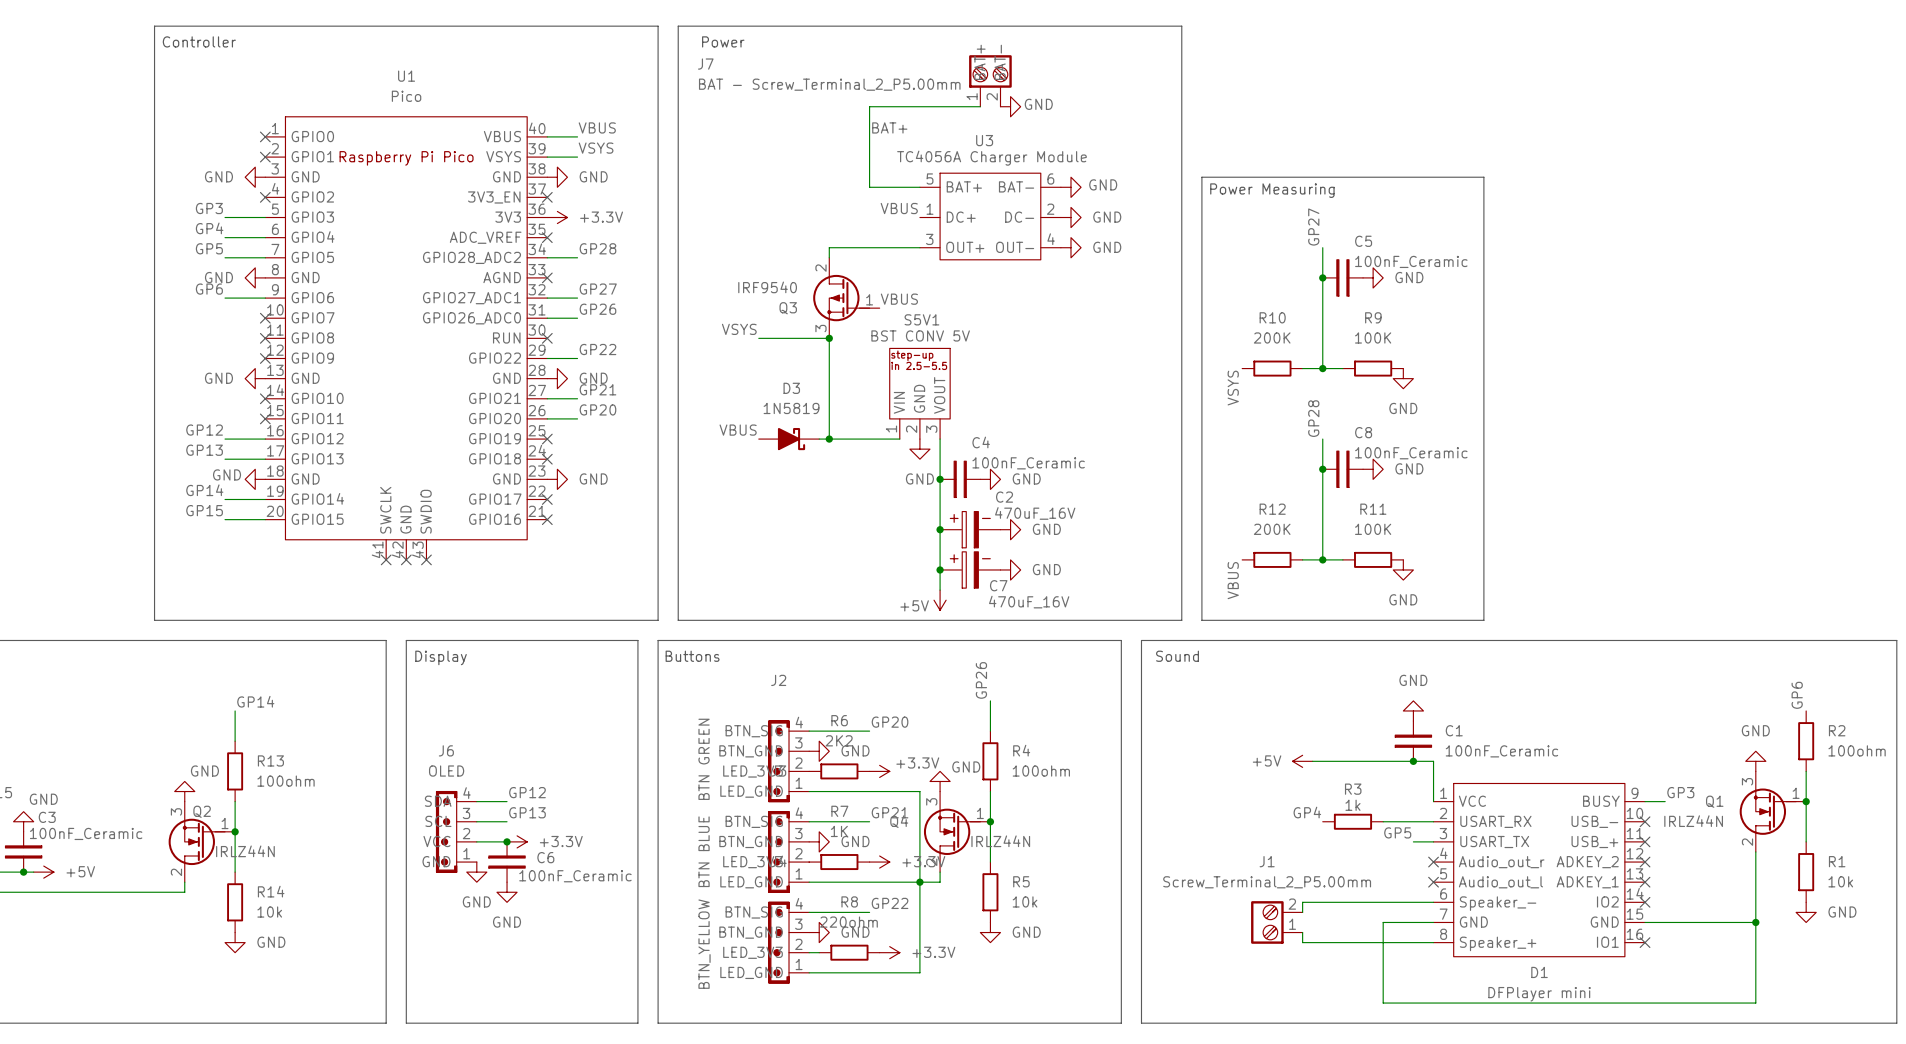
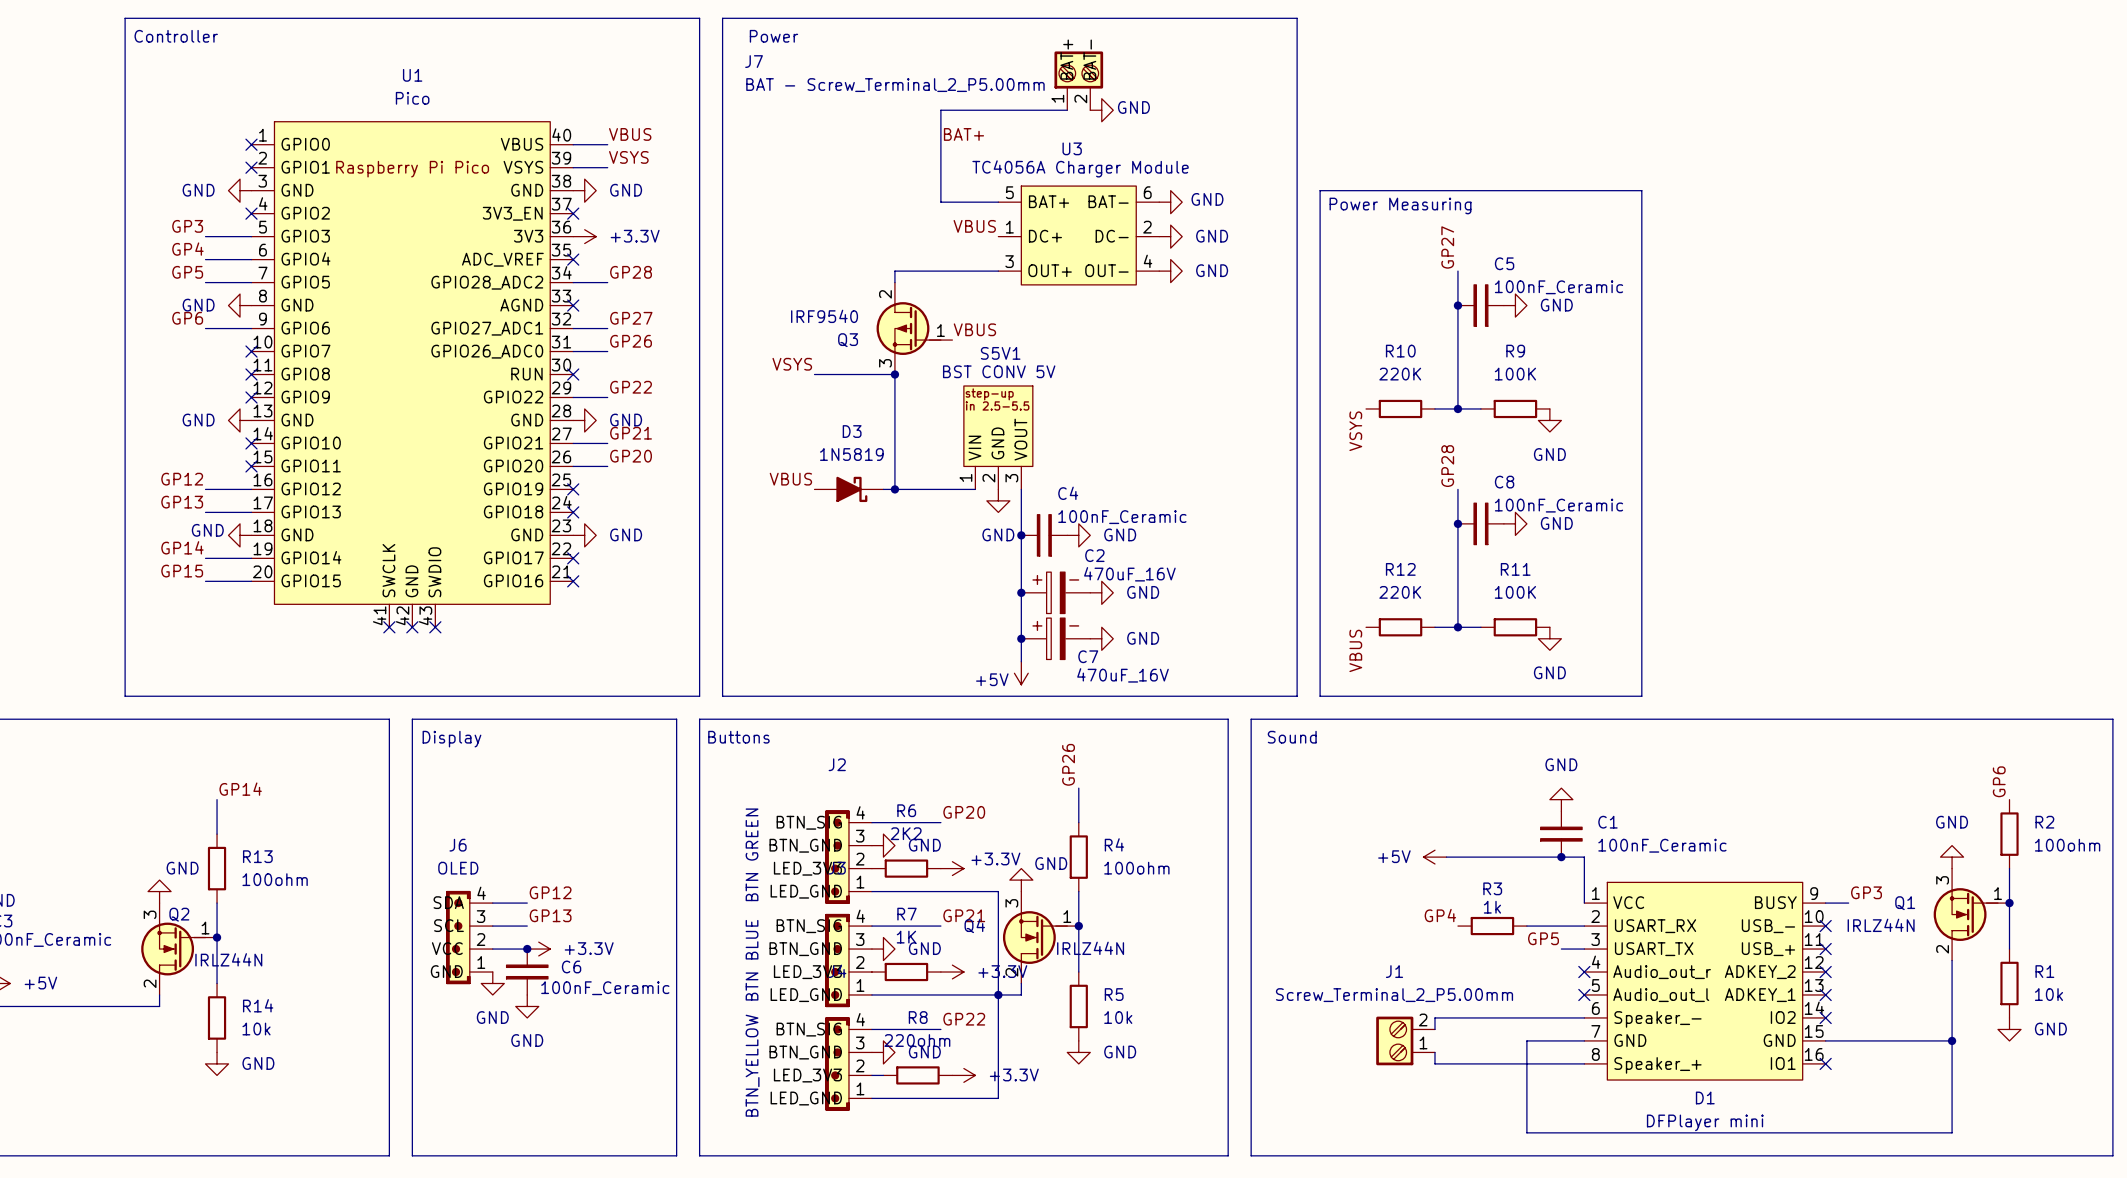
R10 value: 200K (1272, 337) -> 220K (1400, 374)
R12 value: 200K (1272, 529) -> 220K (1400, 592)

